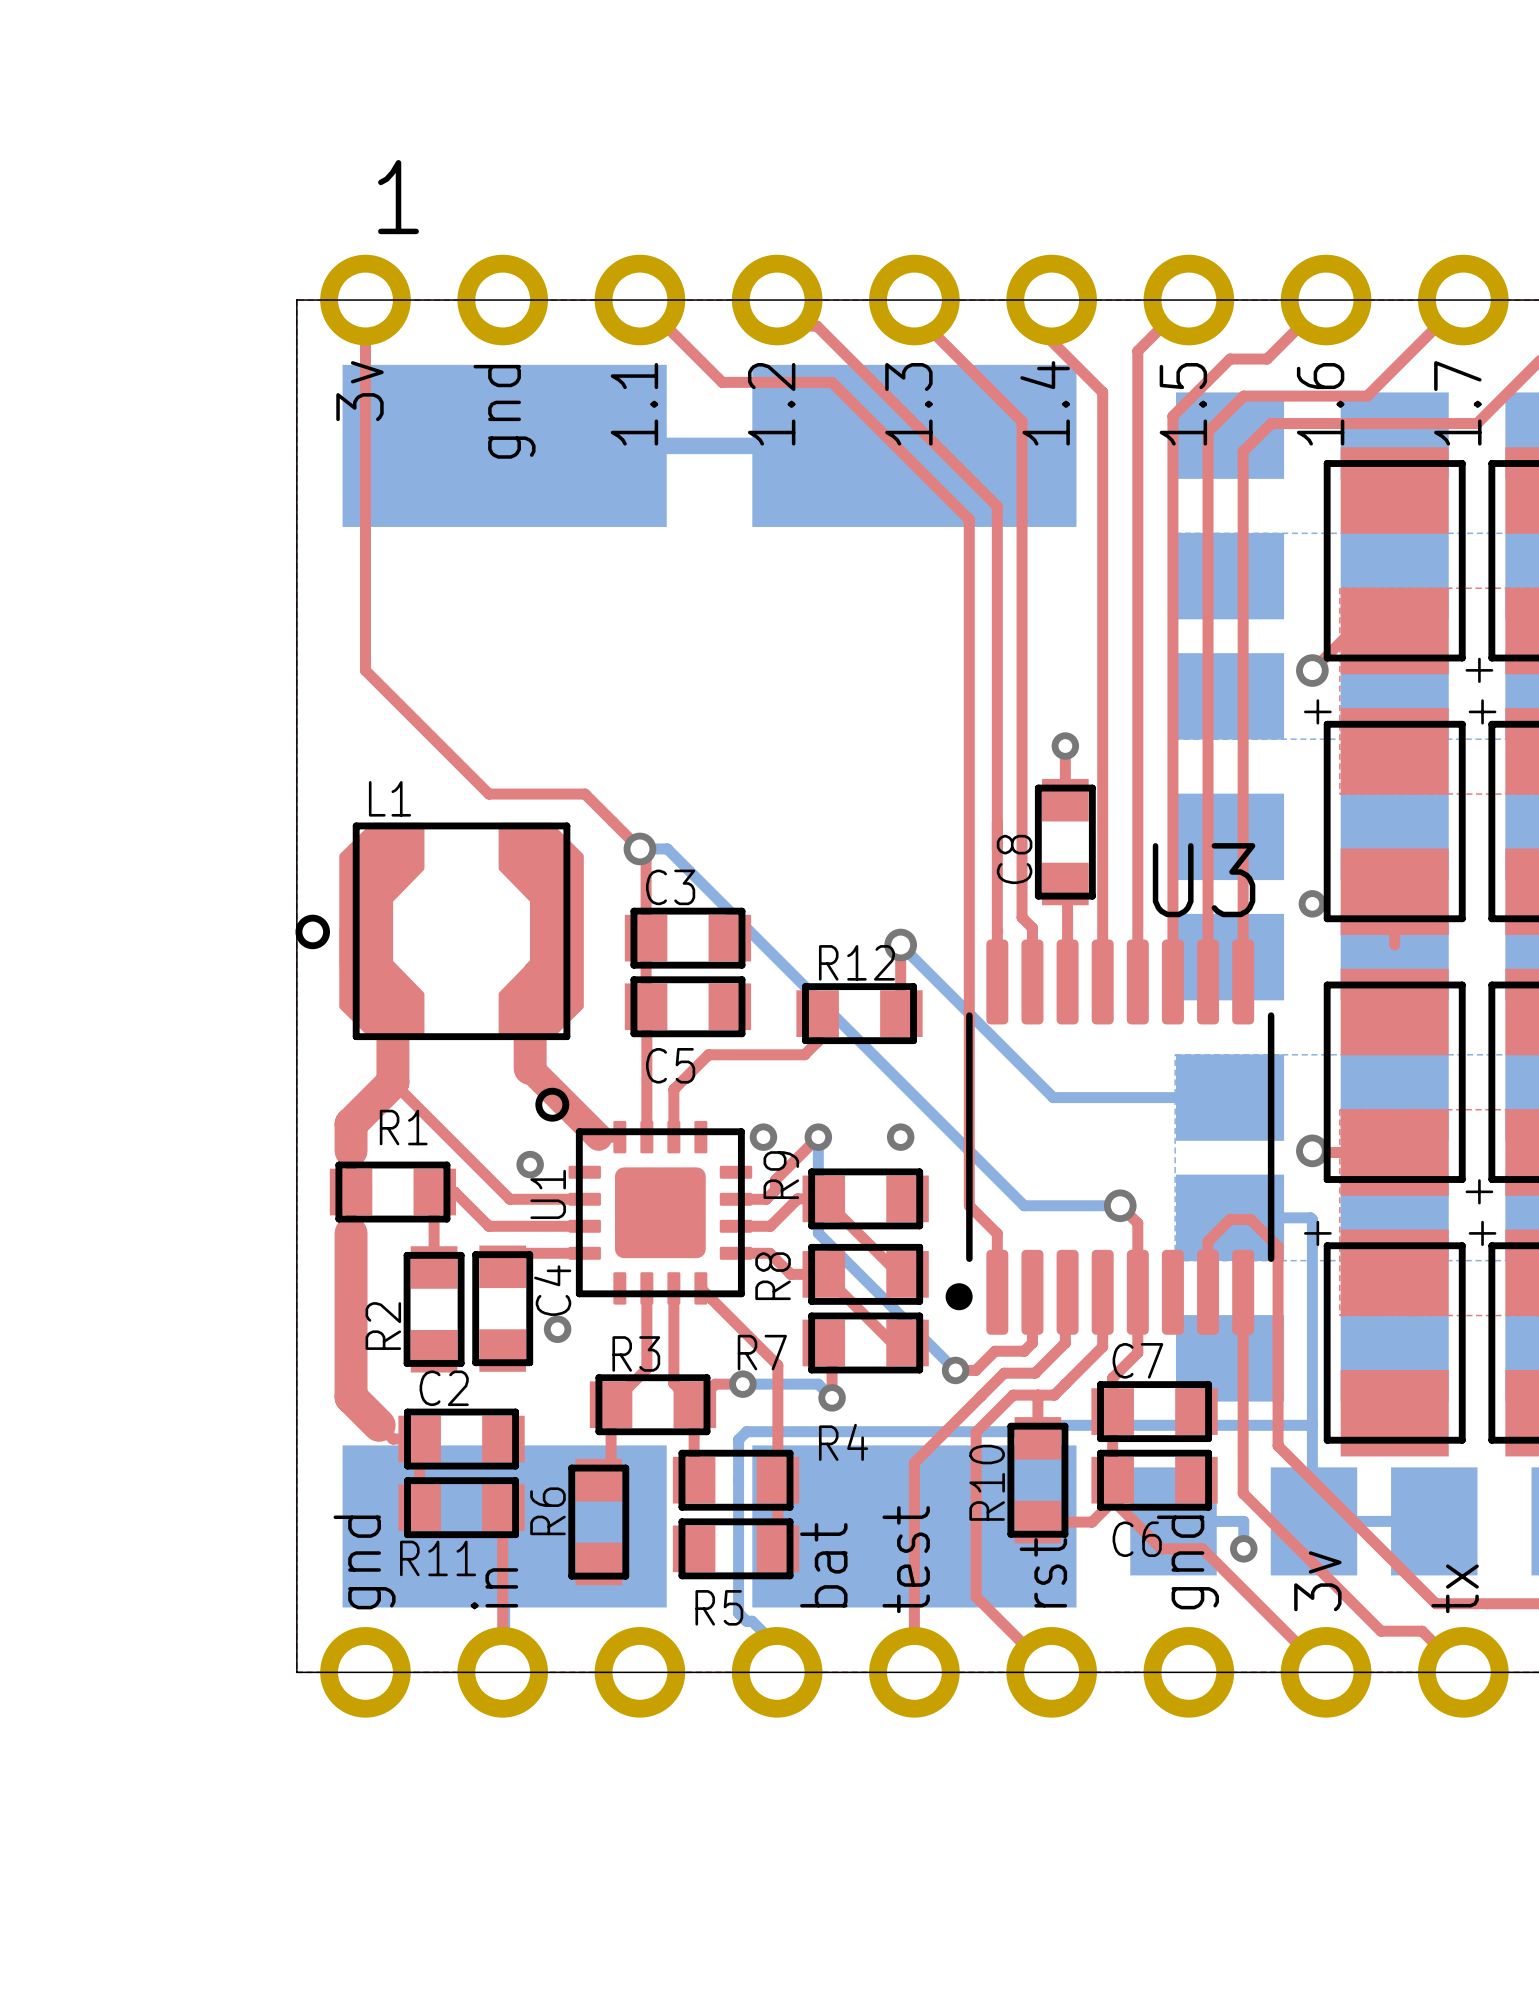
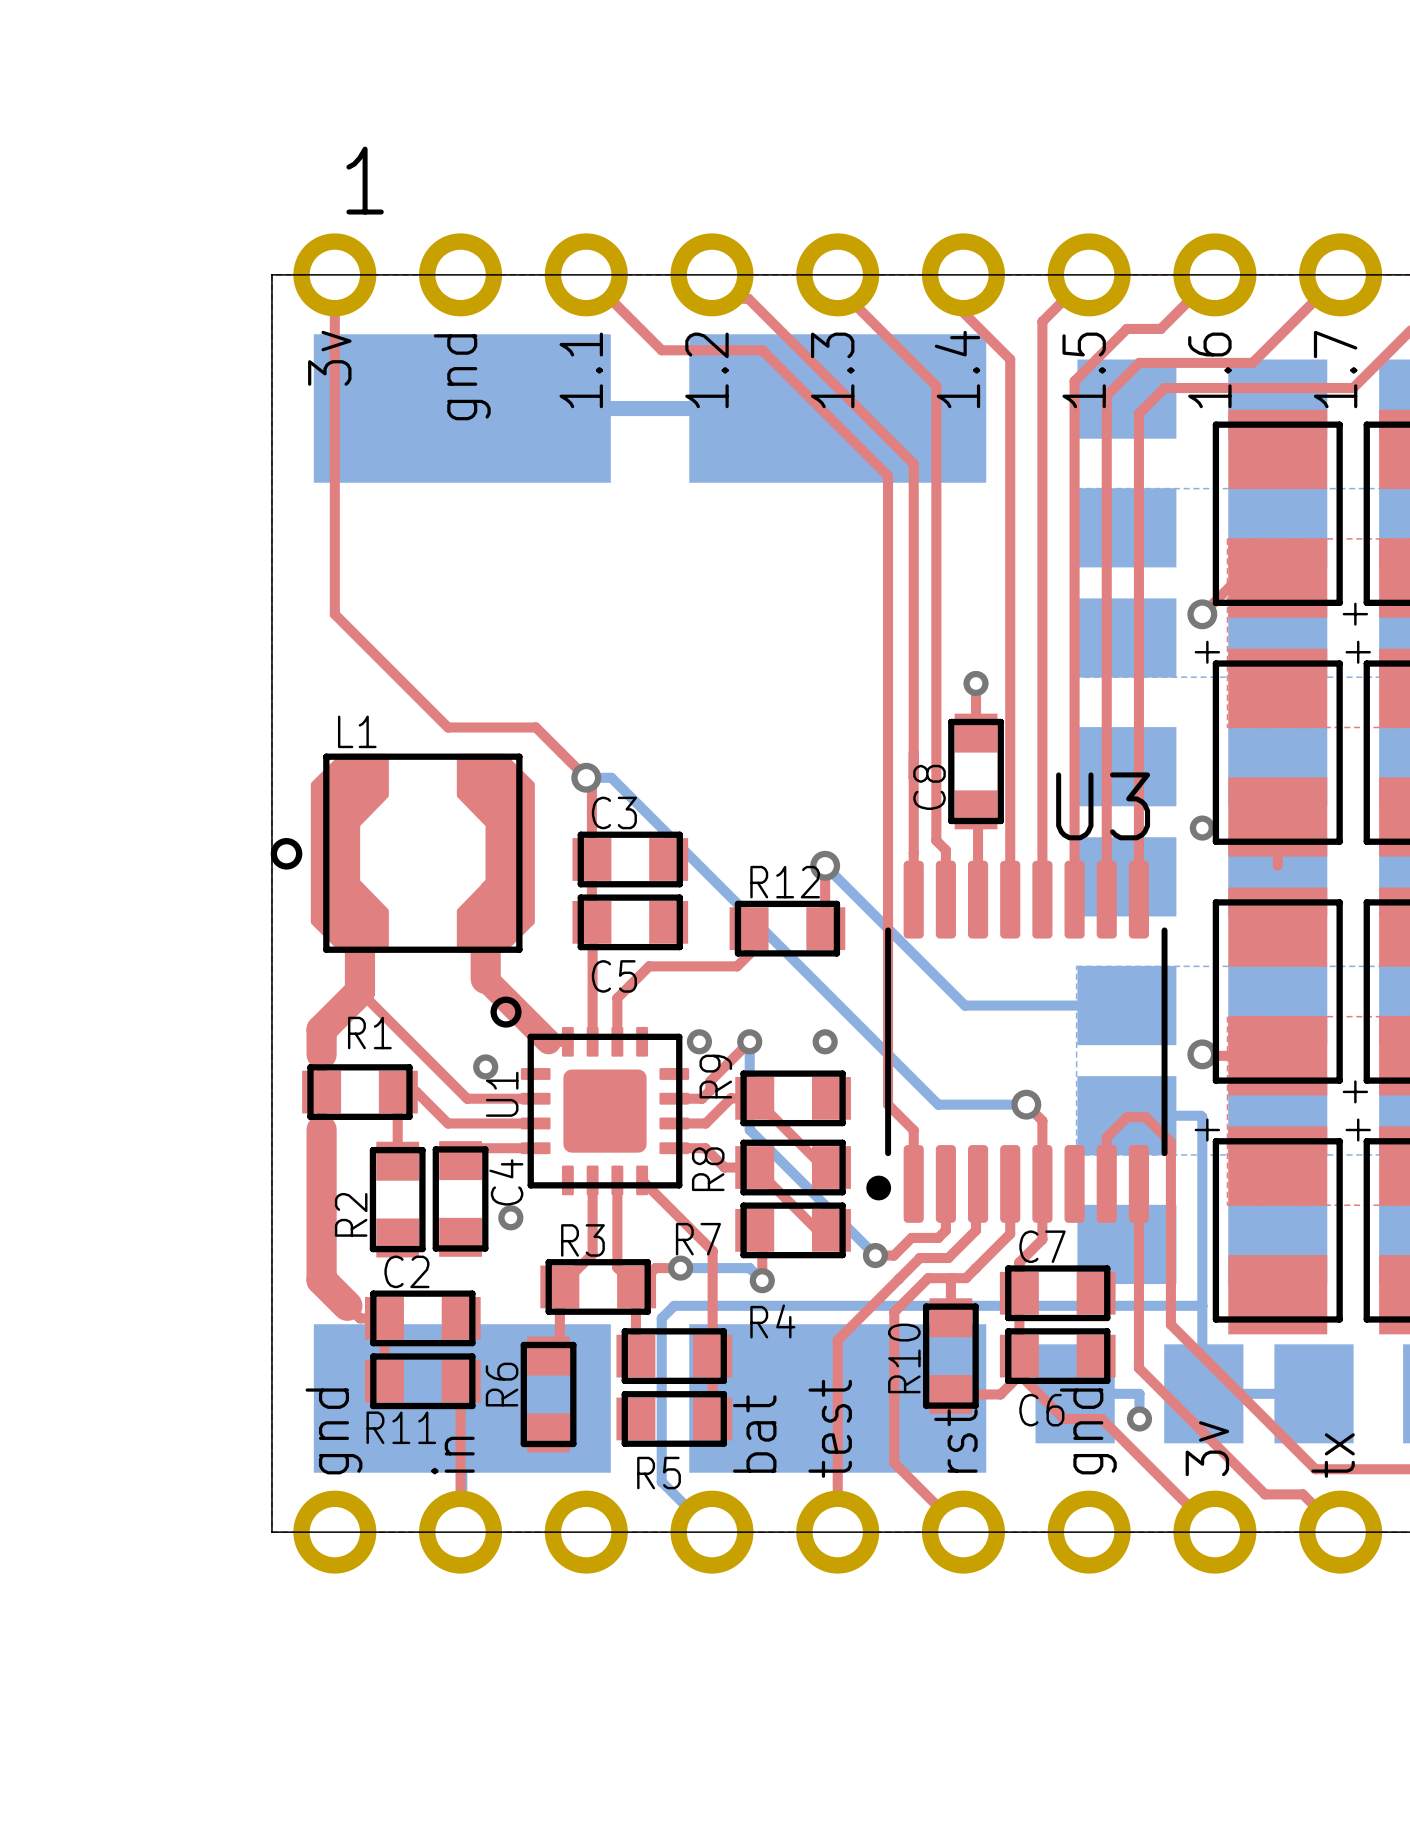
bottom track: (1024, 1425) (1017, 1431) (746, 1431) (738, 1439) (738, 1613) (746, 1621) (752, 1621) (777, 1646) -> (938, 1305) (674, 1305) (661, 1318) (661, 1481) (688, 1508) (712, 1508)

